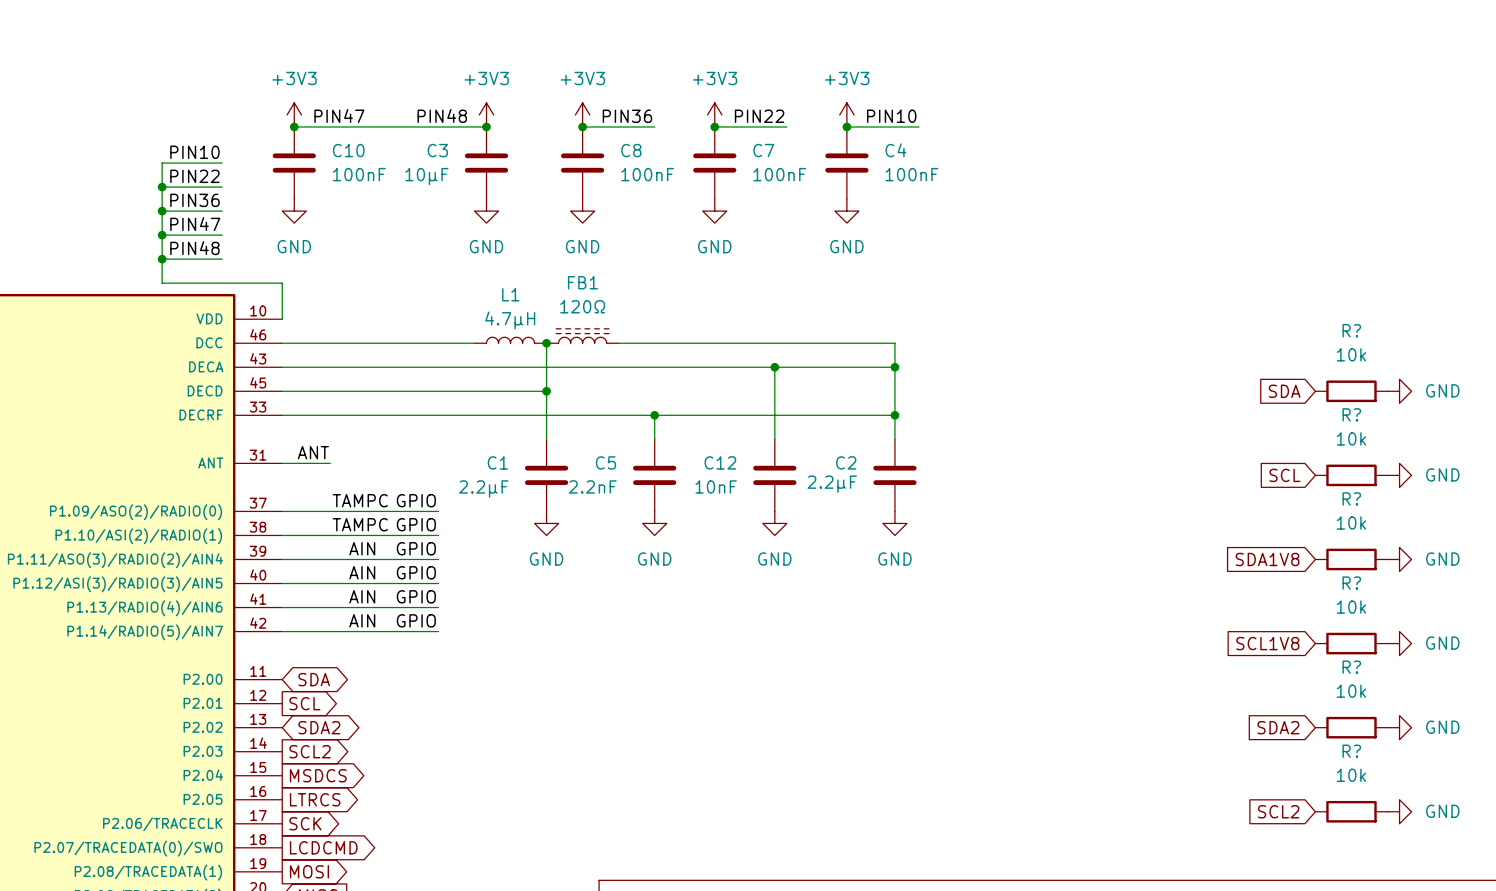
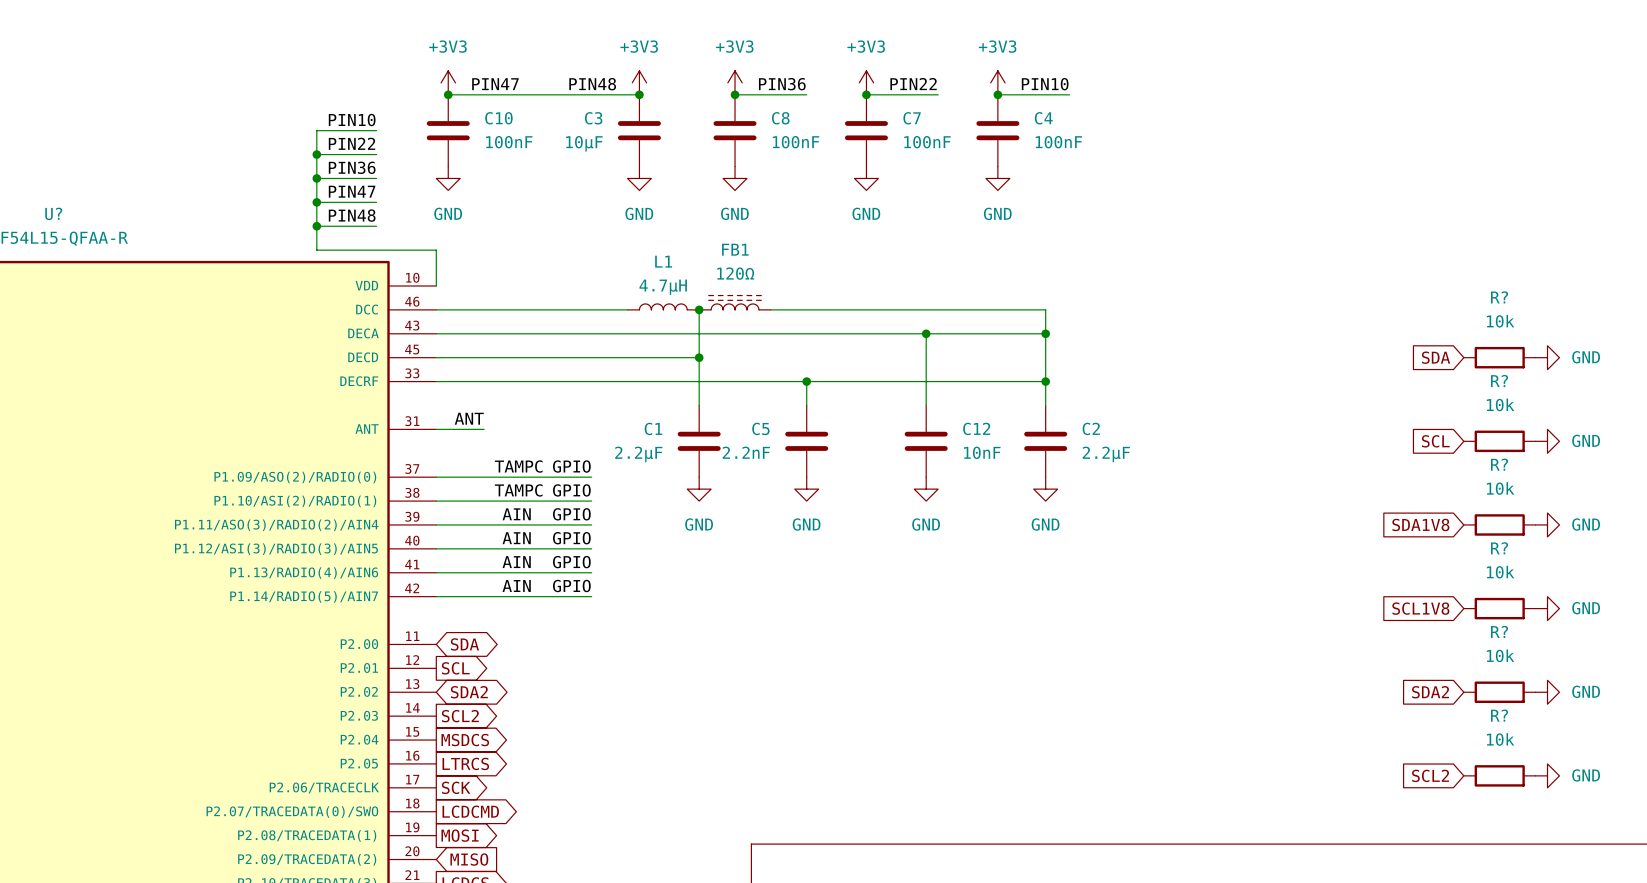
C12 name position: C12 (720, 462) -> C12 (976, 428)
C2 name position: C2 (846, 462) -> C2 (1091, 428)
C2 value position: 2.2µF (832, 484) -> 2.2µF (1106, 454)
C12 value position: 10nF (716, 486) -> 10nF (982, 452)

